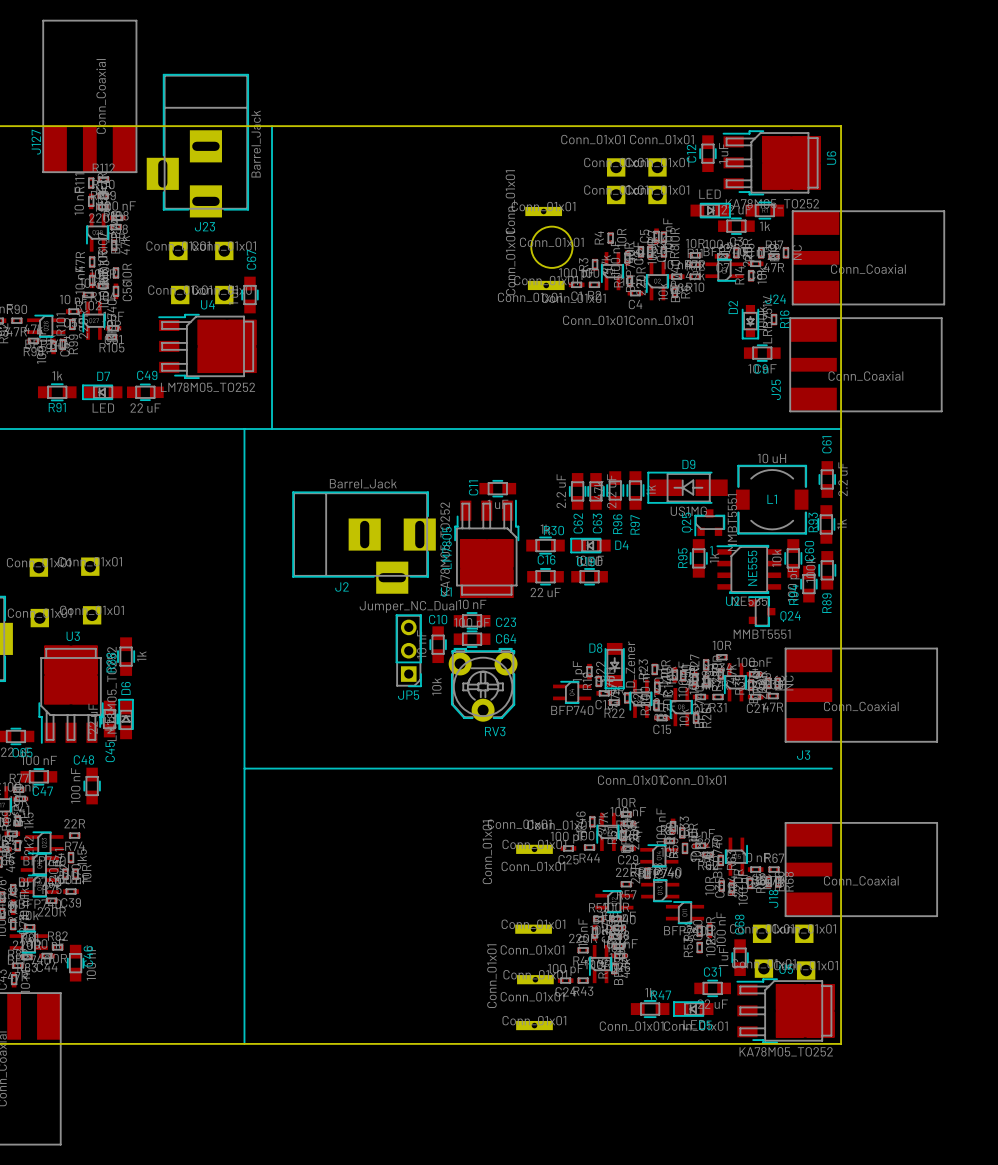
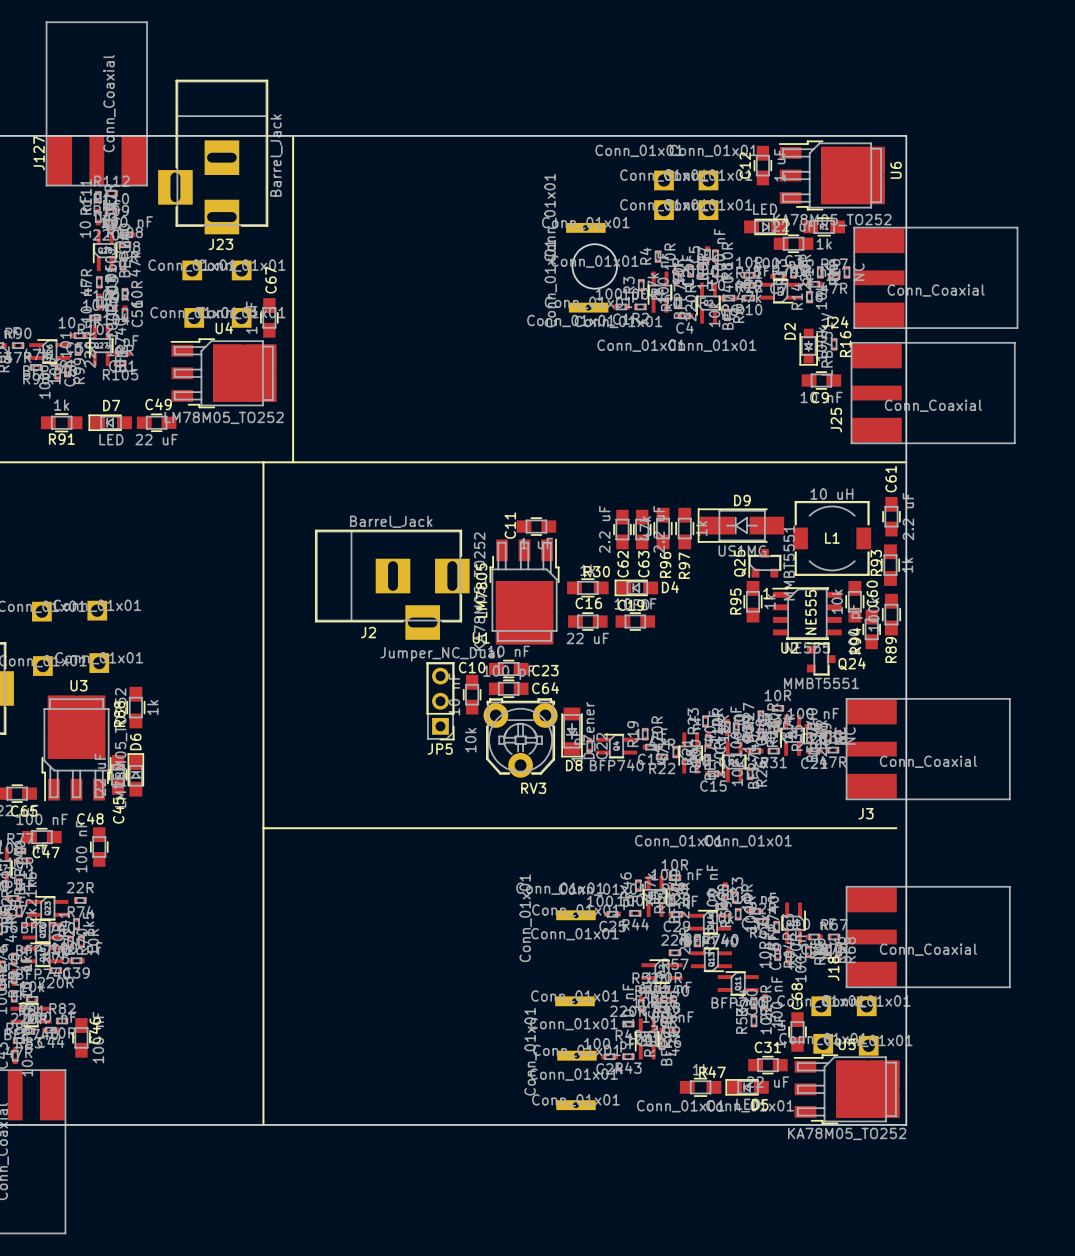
D8 name position: D8 (595, 648) -> D8 (574, 765)
D8 position: (614, 665) -> (572, 732)
C22 position: (589, 671) -> (589, 746)

